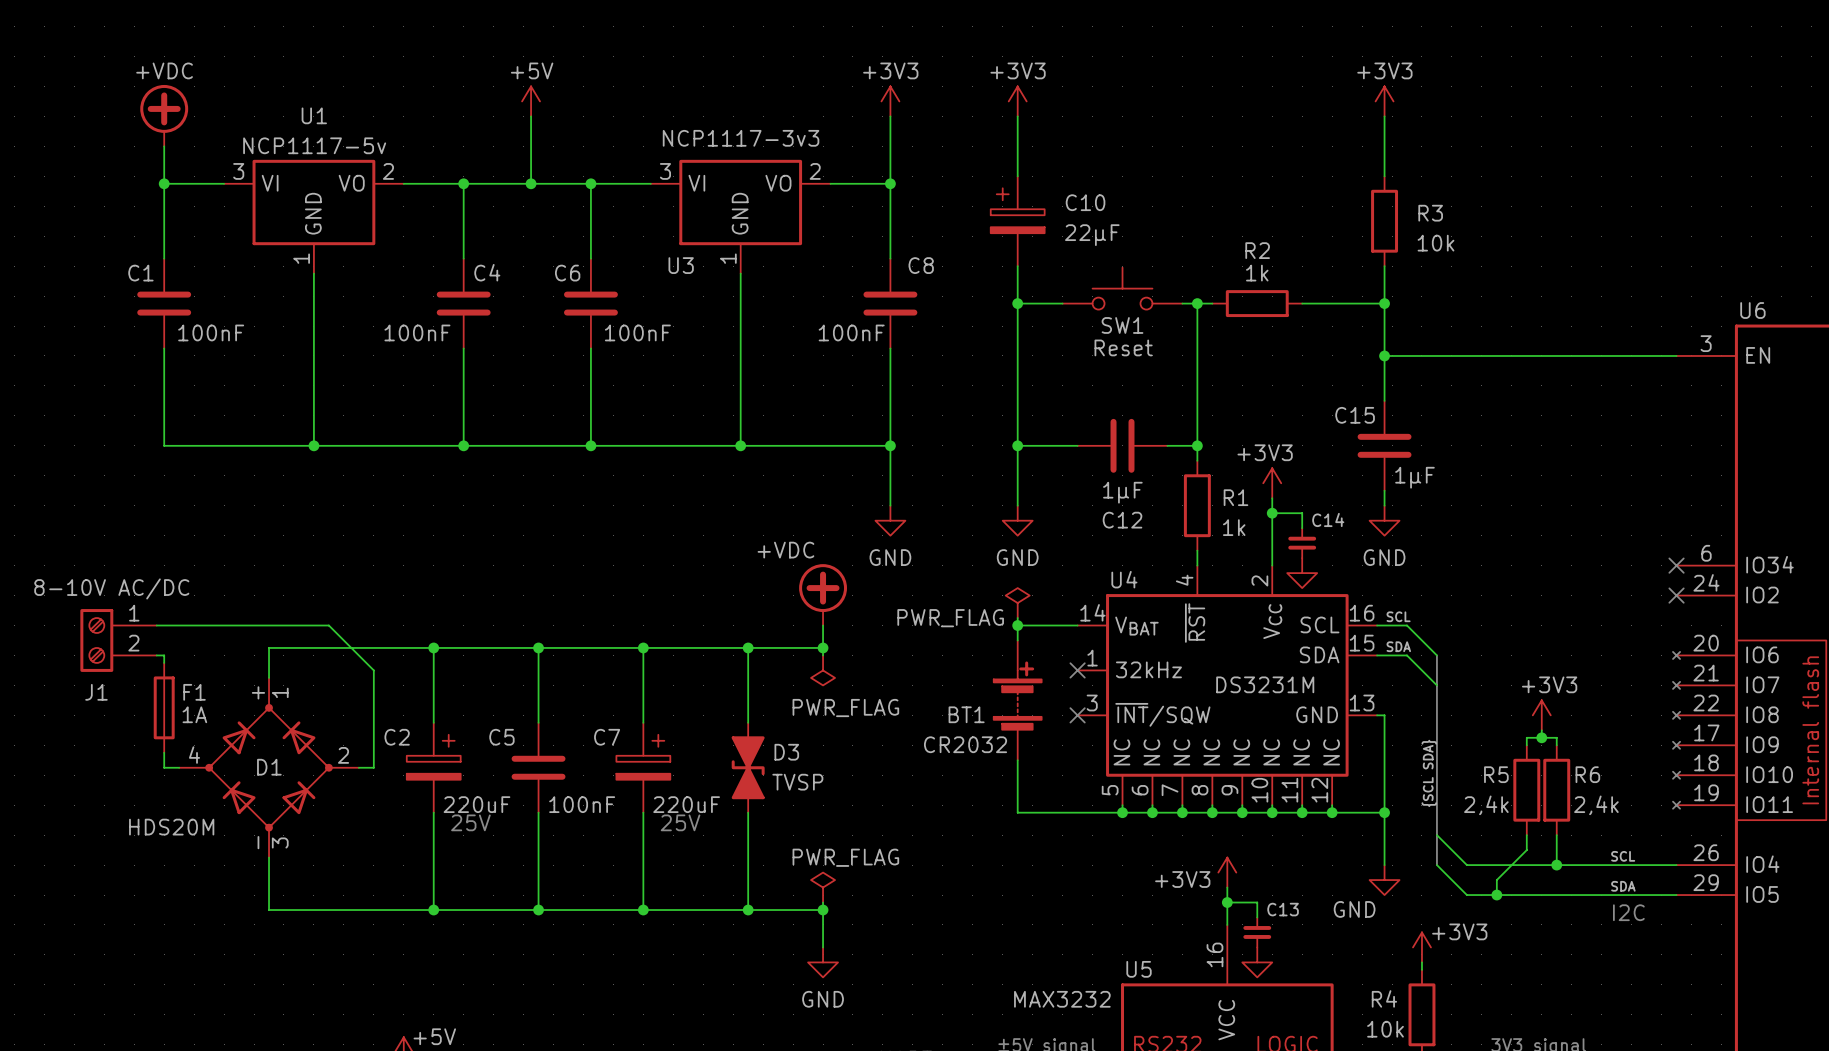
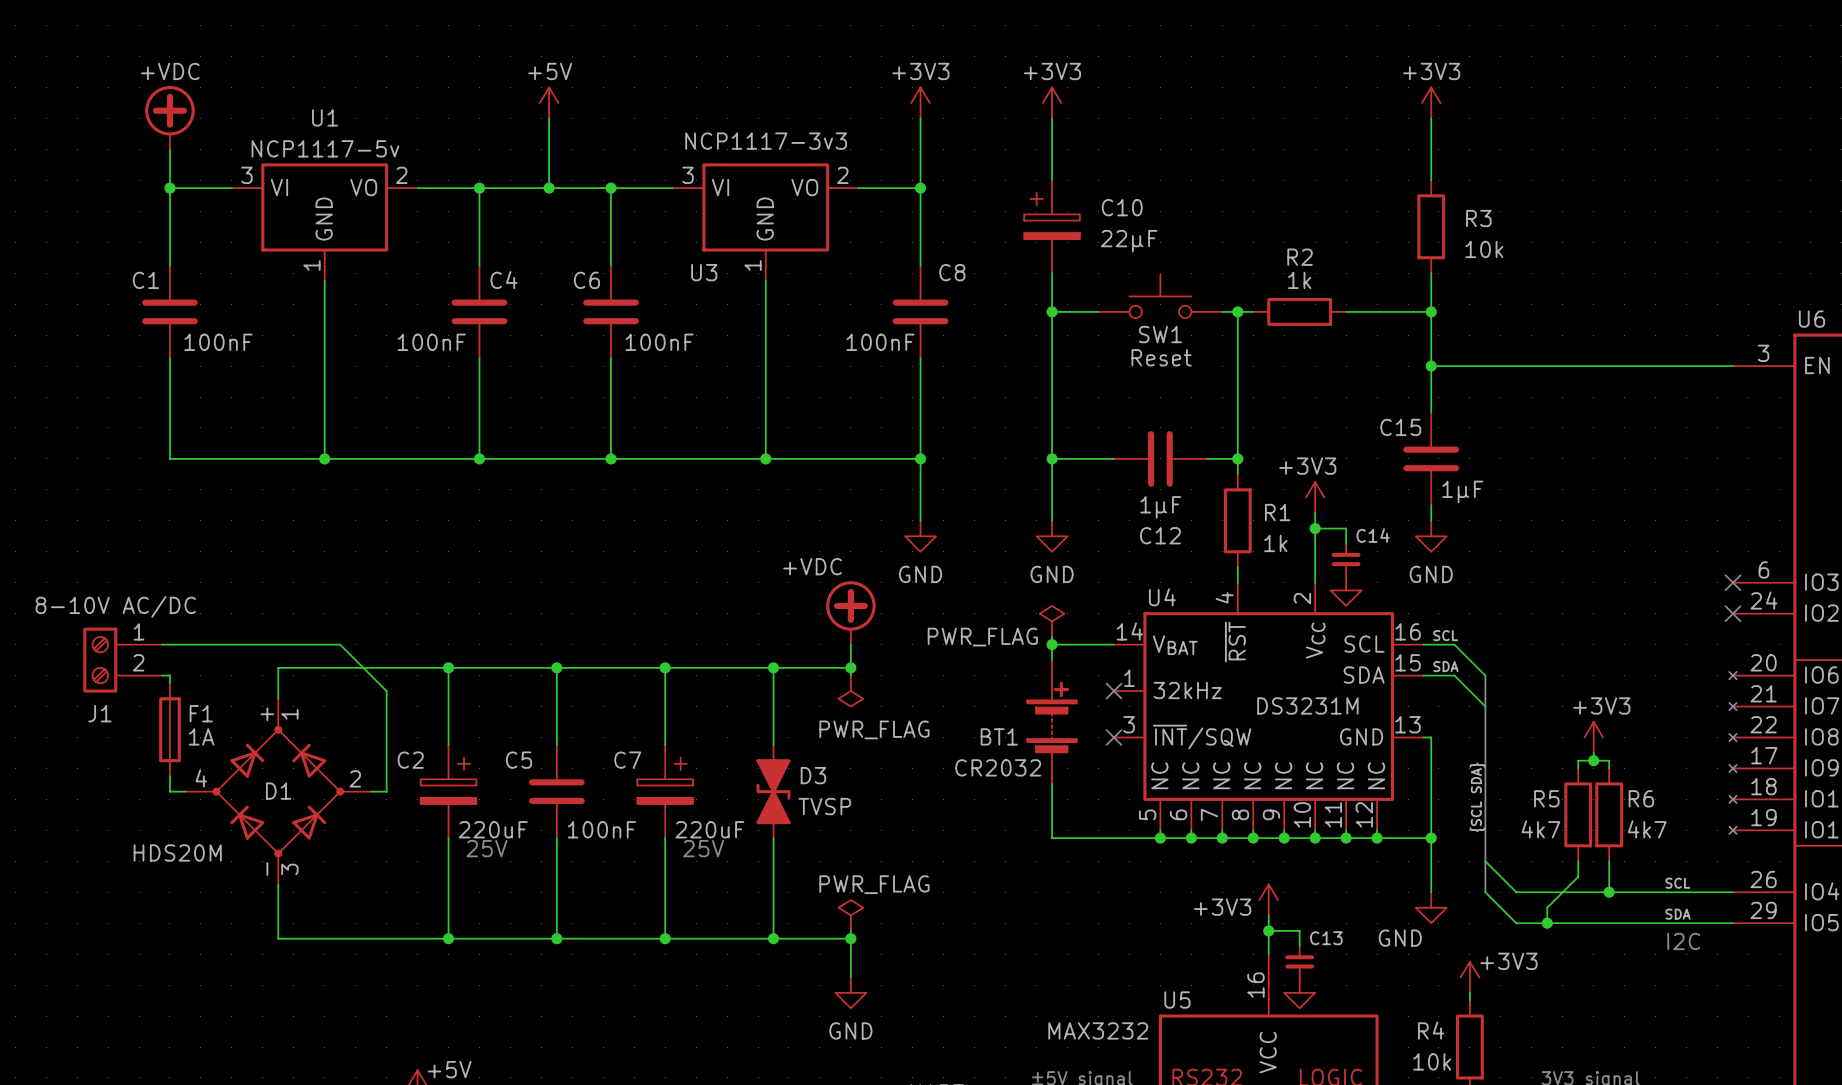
R5 value: 2,4k (1486, 805) -> 4k7 (1540, 829)
R6 value: 2,4k (1596, 805) -> 4k7 (1647, 829)

